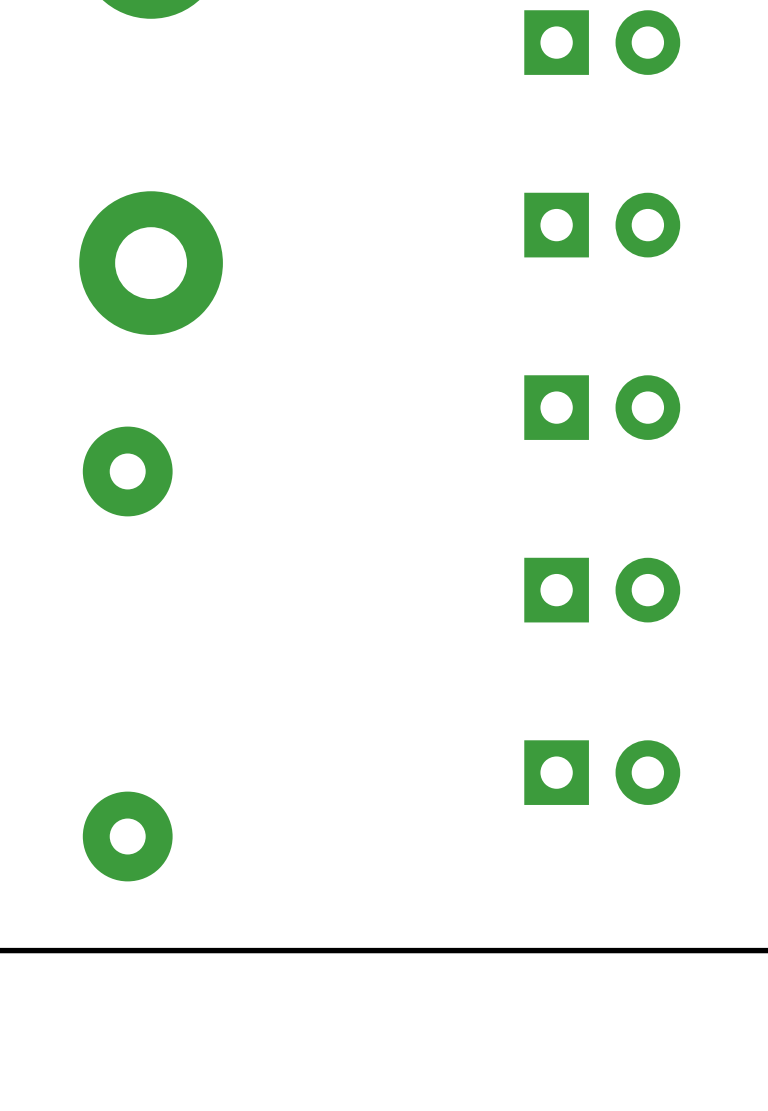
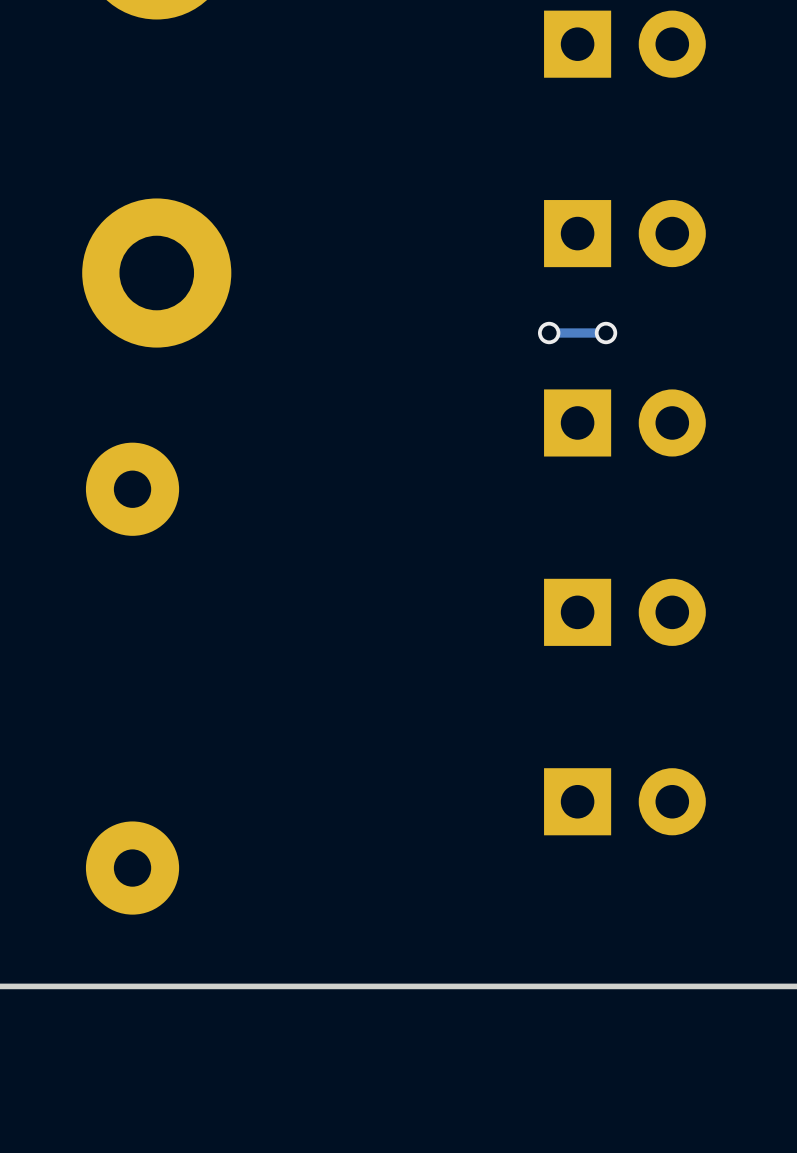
via: none -> (549, 333)
track: none -> (606, 333) (549, 333)
via: none -> (606, 333)

